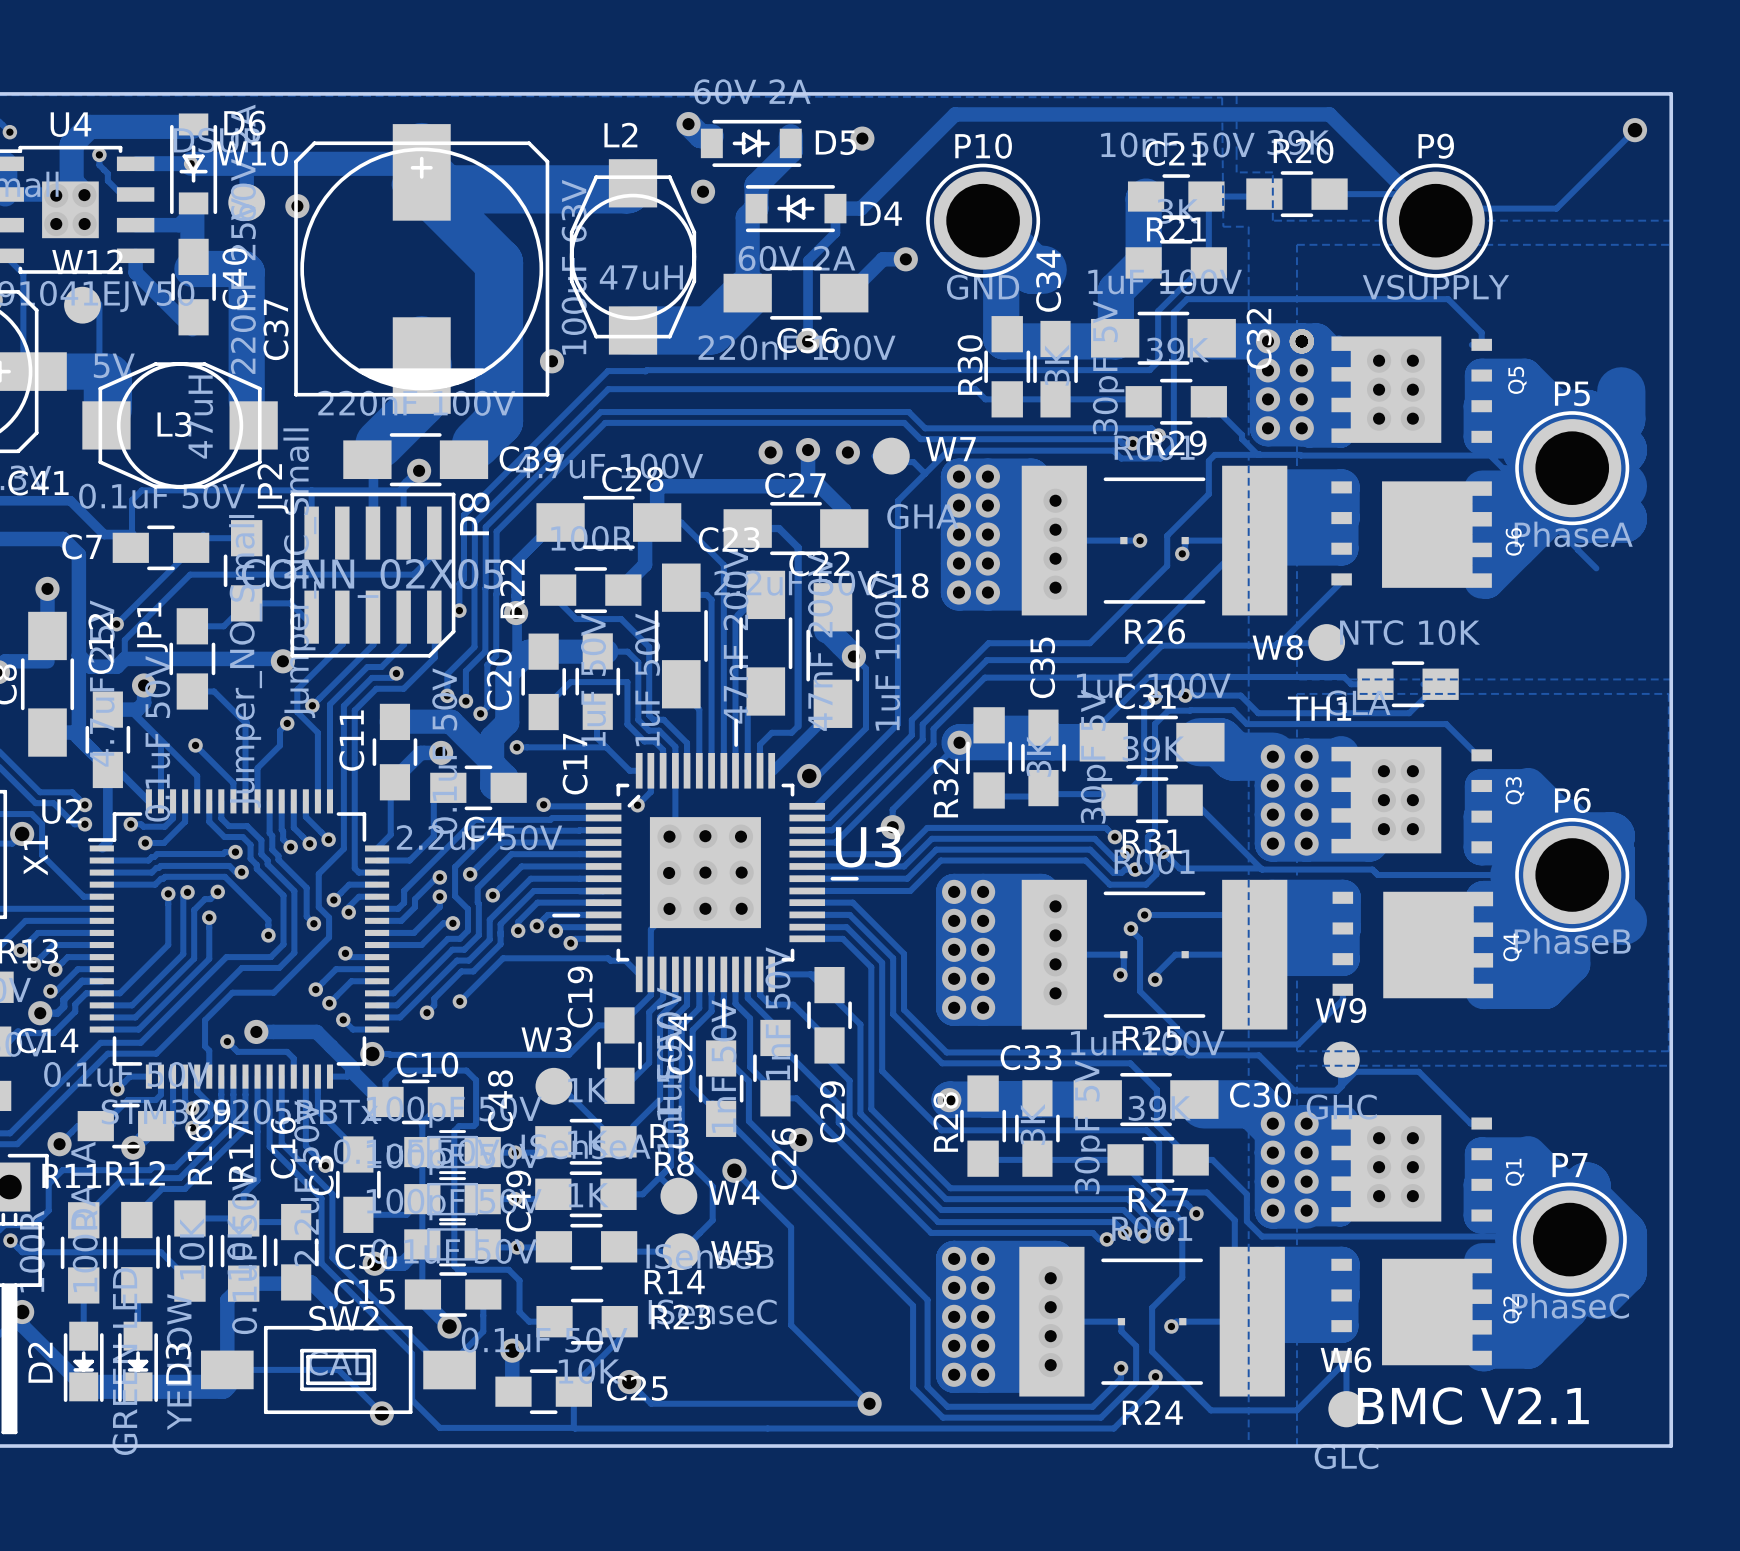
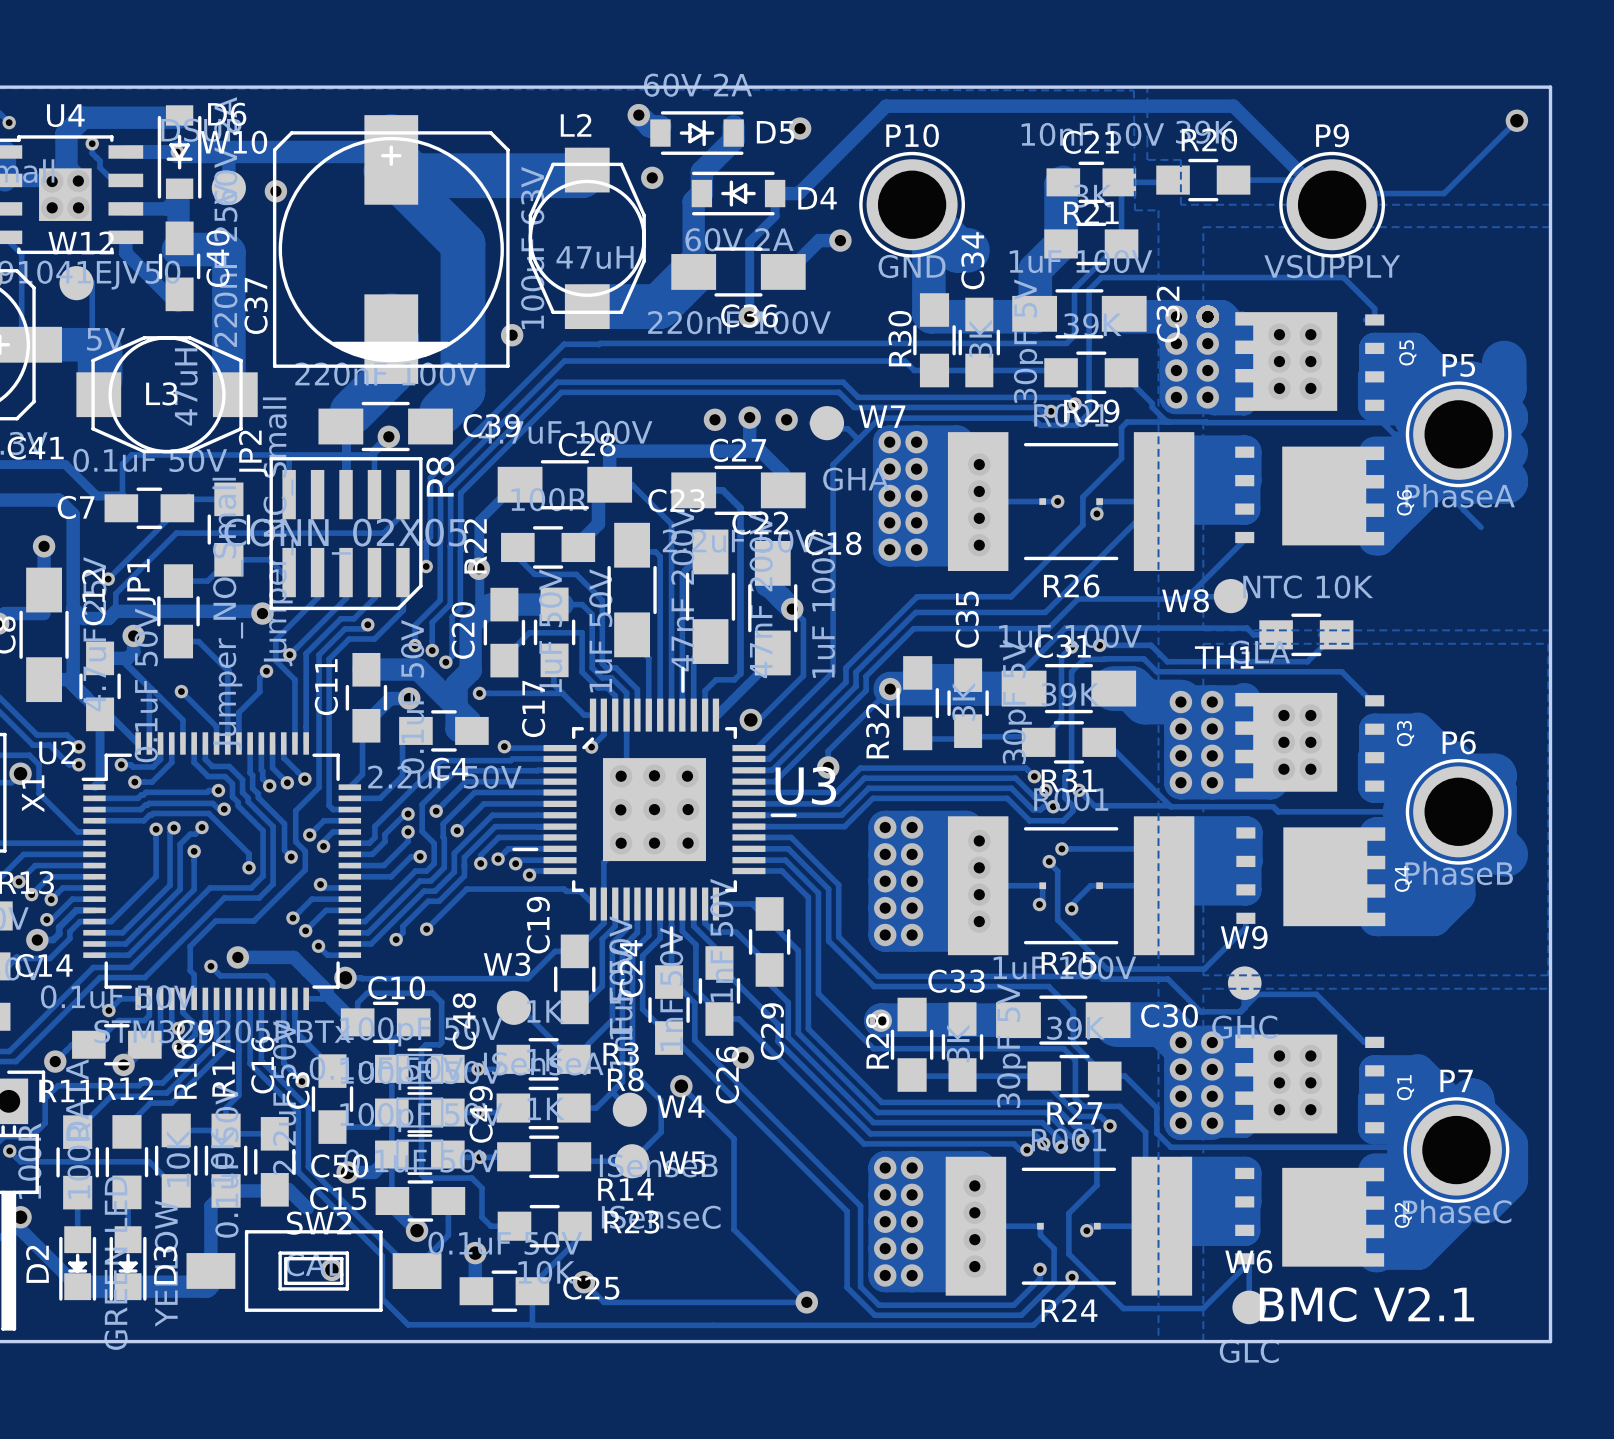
track: (227, 1369) (338, 1369) (381, 1413) -> none
via position: (381, 1413) -> (331, 1269)

